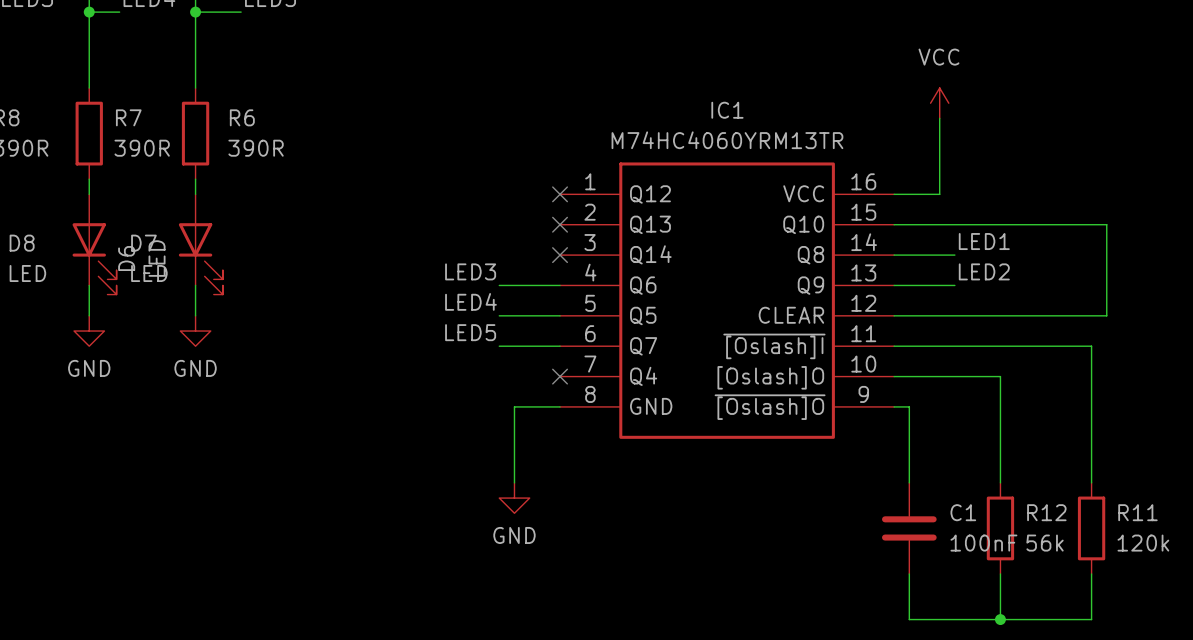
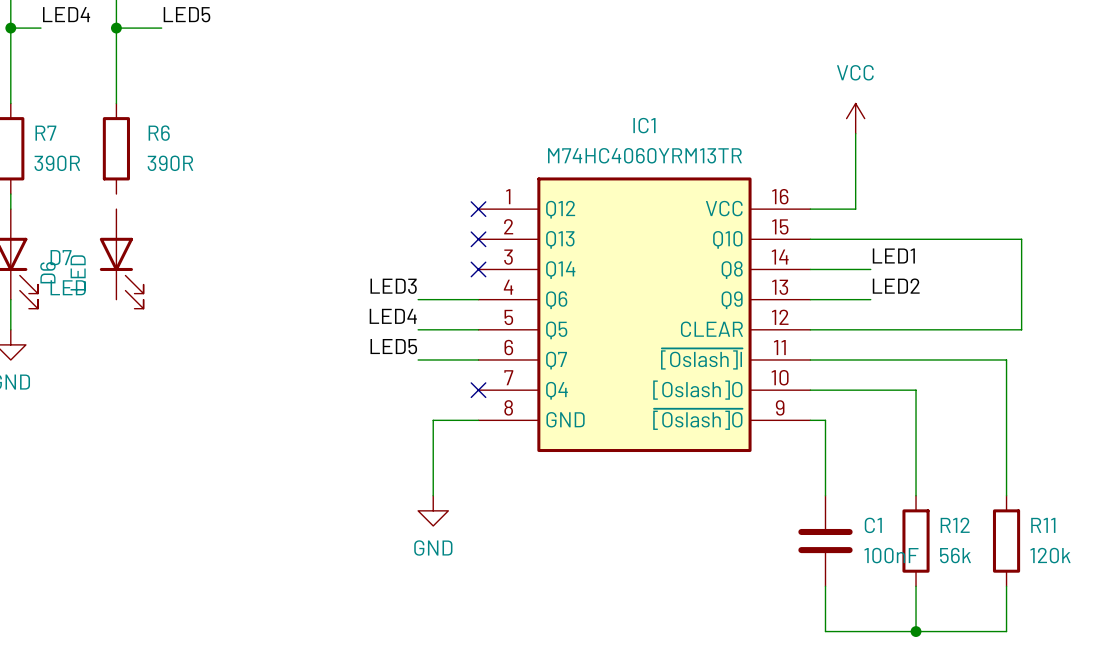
wire: (195, 179) (195, 194) -> none
wire: (195, 285) (195, 315) -> none
power symbol: GND (195, 331) -> none

